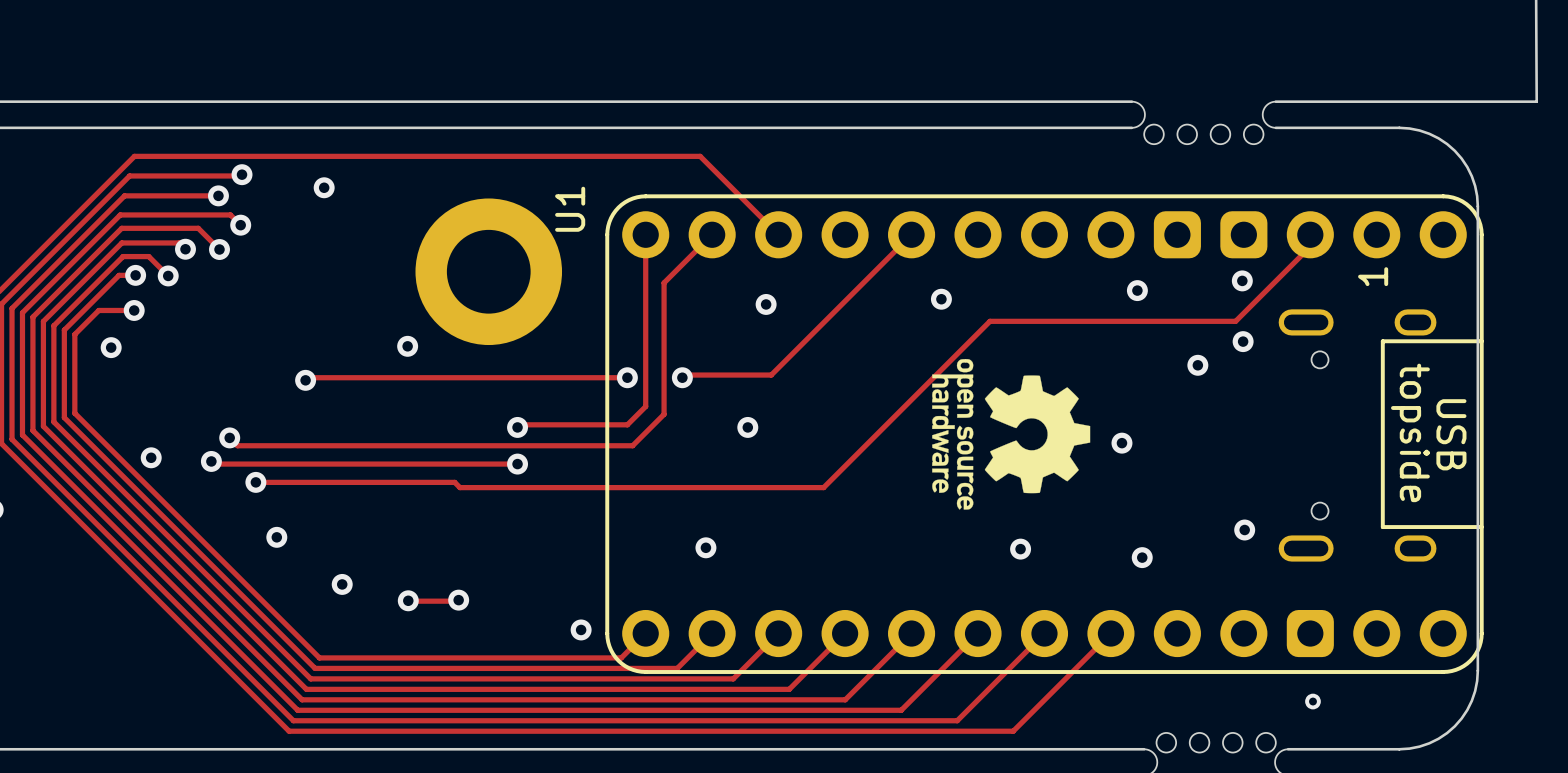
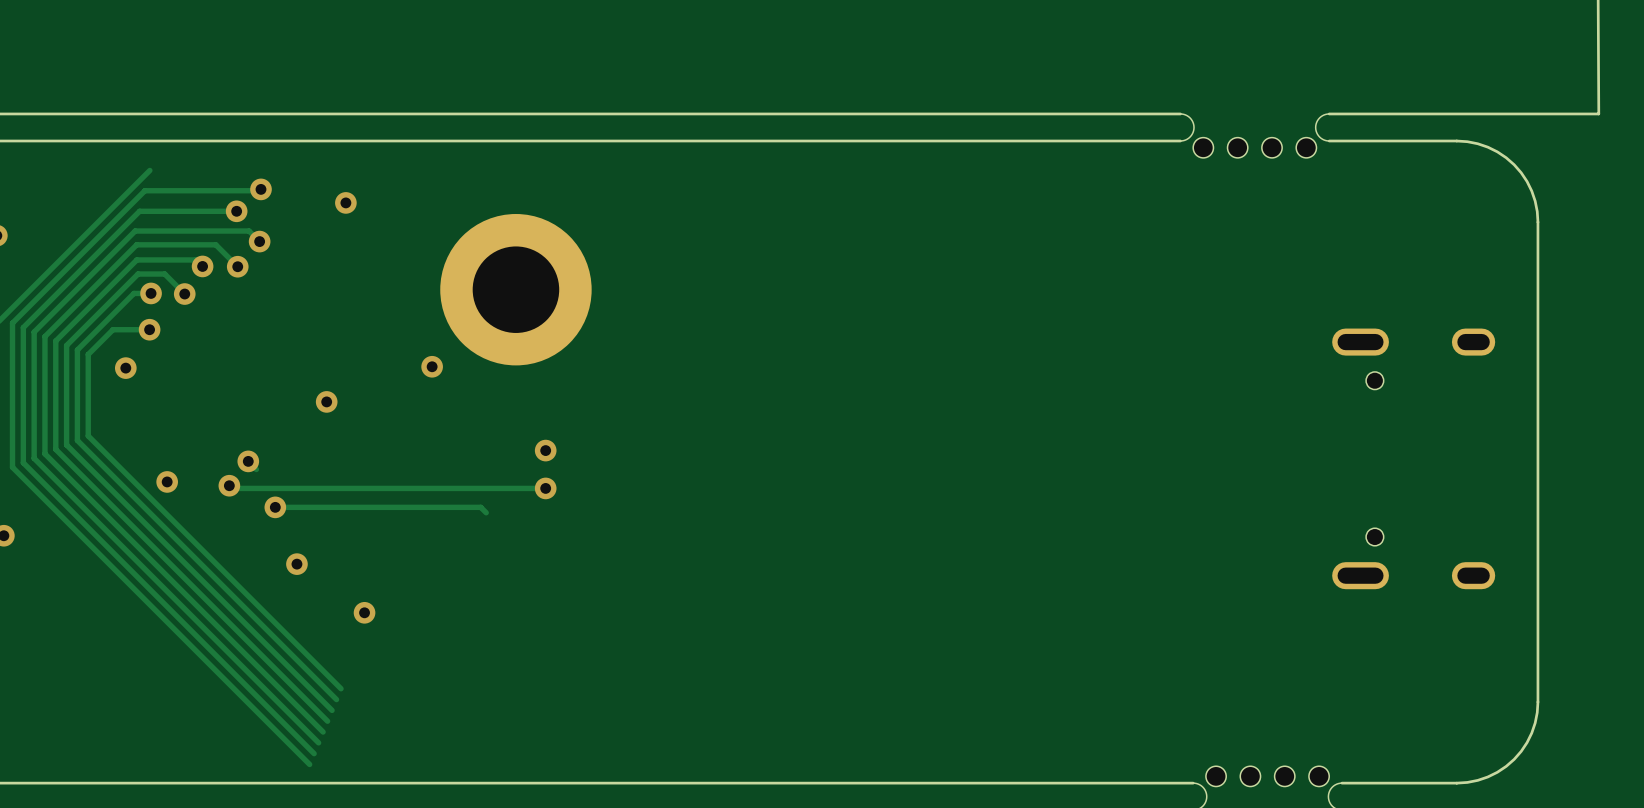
track: (134, 156) (700, 156) (778, 234) -> none
track: (645, 234) (645, 406) (627, 424) (520, 424) -> none
track: (712, 234) (664, 282) (664, 414) (632, 445) (237, 445) -> none
track: (911, 234) (771, 375) (685, 375) (682, 377) -> none
track: (1310, 234) (1310, 246) (1235, 321) (989, 321) (823, 487) (459, 487) -> none
via: (1242, 280) -> none
via: (1137, 290) -> none
via: (941, 299) -> none
via: (766, 304) -> none
via: (1243, 341) -> none
drawing: [932, 359, 1091, 510] -> none
via: (1197, 365) -> none
track: (308, 377) (627, 377) -> none
via: (627, 377) -> none
via: (682, 377) -> none
via: (747, 427) -> none
U1: (1044, 434) -> none
via: (1121, 443) -> none
via: (1244, 530) -> none
via: (705, 547) -> none
via: (1020, 549) -> none
via: (1142, 557) -> none
via: (408, 600) -> none
track: (458, 600) (408, 600) -> none
via: (458, 600) -> none
via: (581, 629) -> none
track: (645, 633) (621, 657) (319, 657) -> none
track: (712, 633) (677, 668) (315, 668) -> none
track: (778, 633) (733, 678) (310, 678) -> none
track: (845, 633) (789, 689) (306, 689) -> none
track: (911, 633) (845, 699) (302, 699) -> none
track: (978, 633) (901, 710) (297, 710) -> none
track: (1044, 633) (957, 720) (293, 720) -> none
track: (1110, 633) (1013, 731) (289, 731) -> none
via: (1312, 701) -> none

